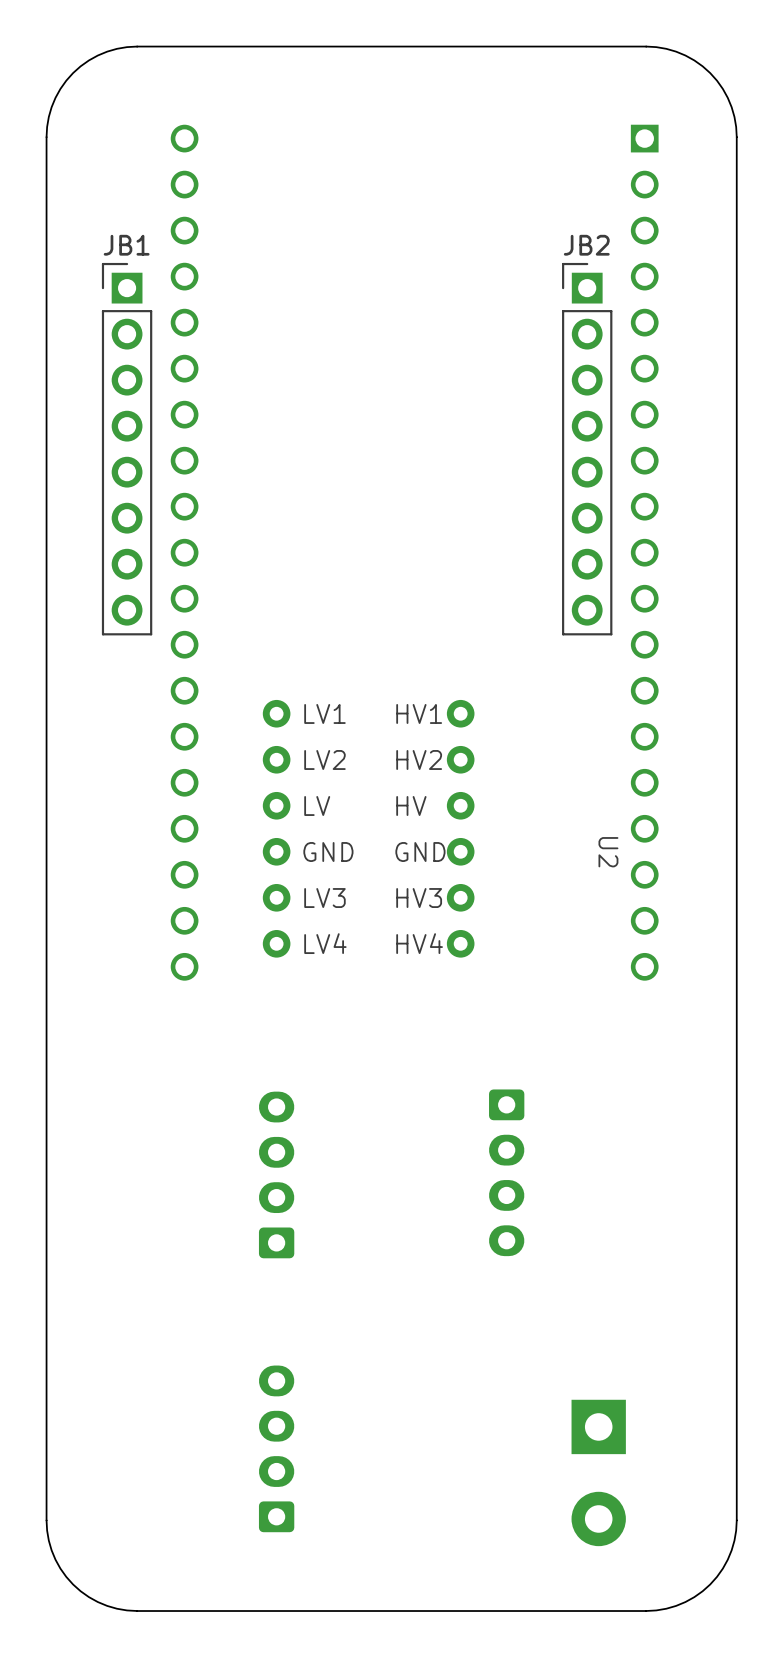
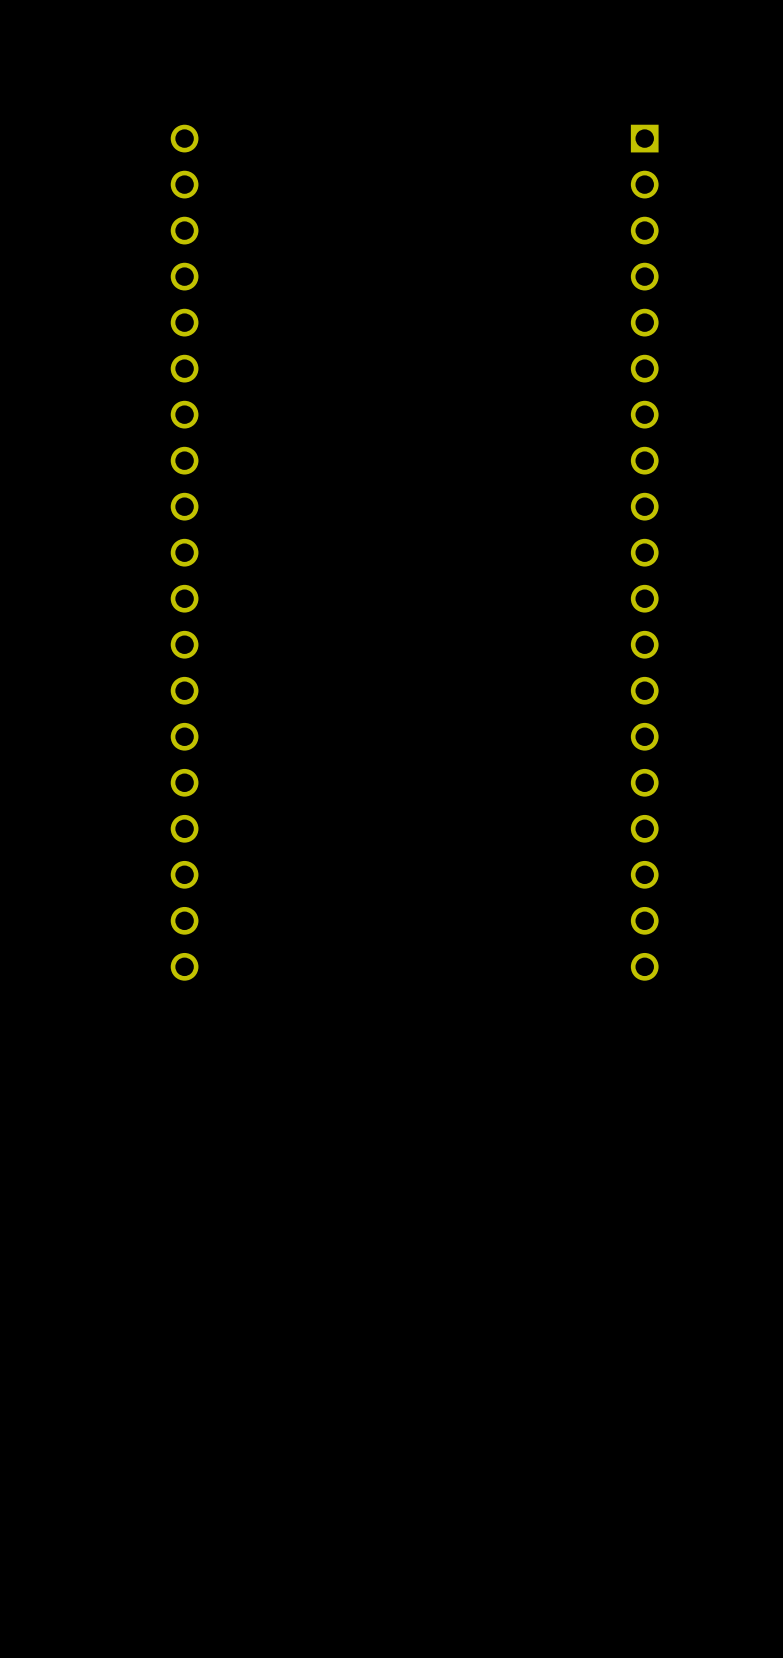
board edge: (646, 46) (126, 47) (107, 51) (80, 66) (66, 80) (51, 107) (46, 137) (46, 1520) (48, 1540) (60, 1568) (80, 1591) (107, 1605) (137, 1611) (656, 1610) (676, 1605) (702, 1591) (716, 1576) (731, 1550) (736, 1520) (736, 126) (727, 97) (716, 80) (702, 66) (676, 51) (646, 46) -> none
JB1: (127, 449) -> none
JB2: (587, 449) -> none
U2: (368, 828) -> none
part: (506, 1172) -> none
part: (276, 1174) -> none
part: (276, 1448) -> none
part: (598, 1472) -> none

